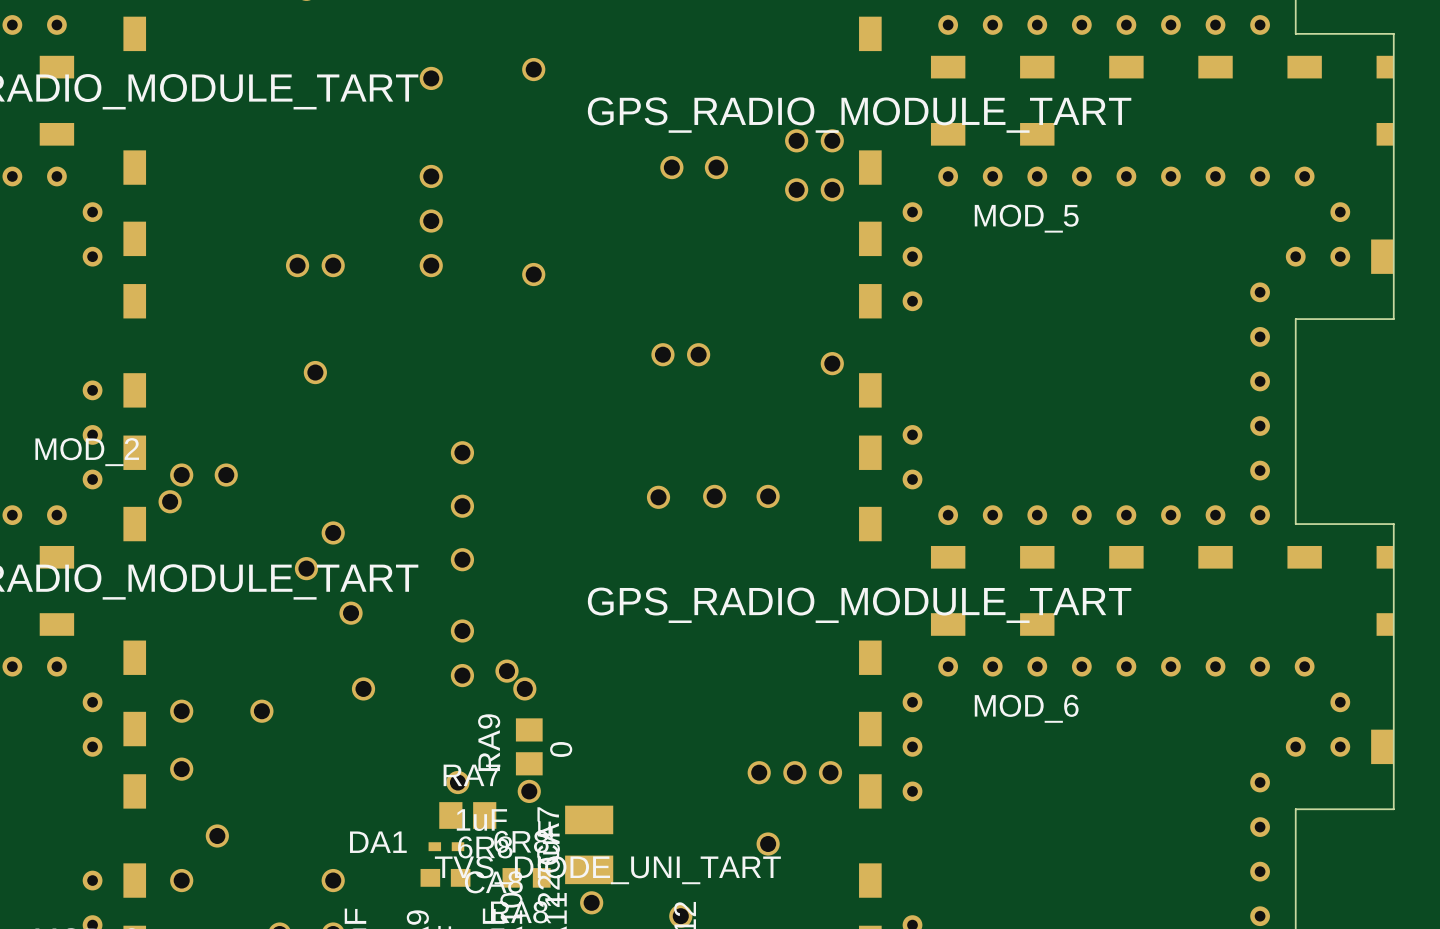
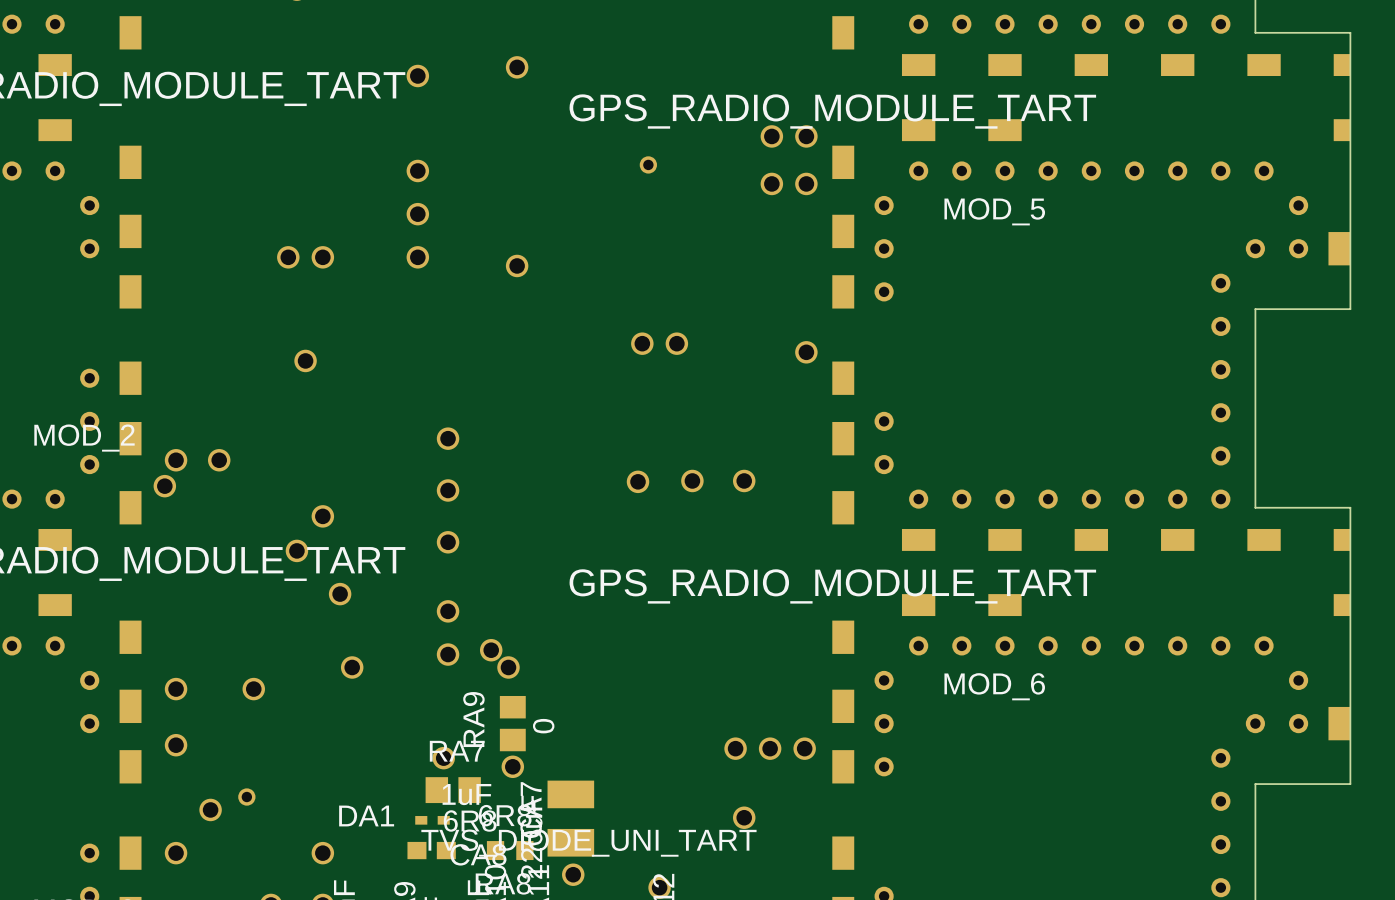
part footprint: [660, 155, 684, 180] -> [639, 156, 658, 174]
part: (716, 167) -> none
part: none -> (246, 797)

